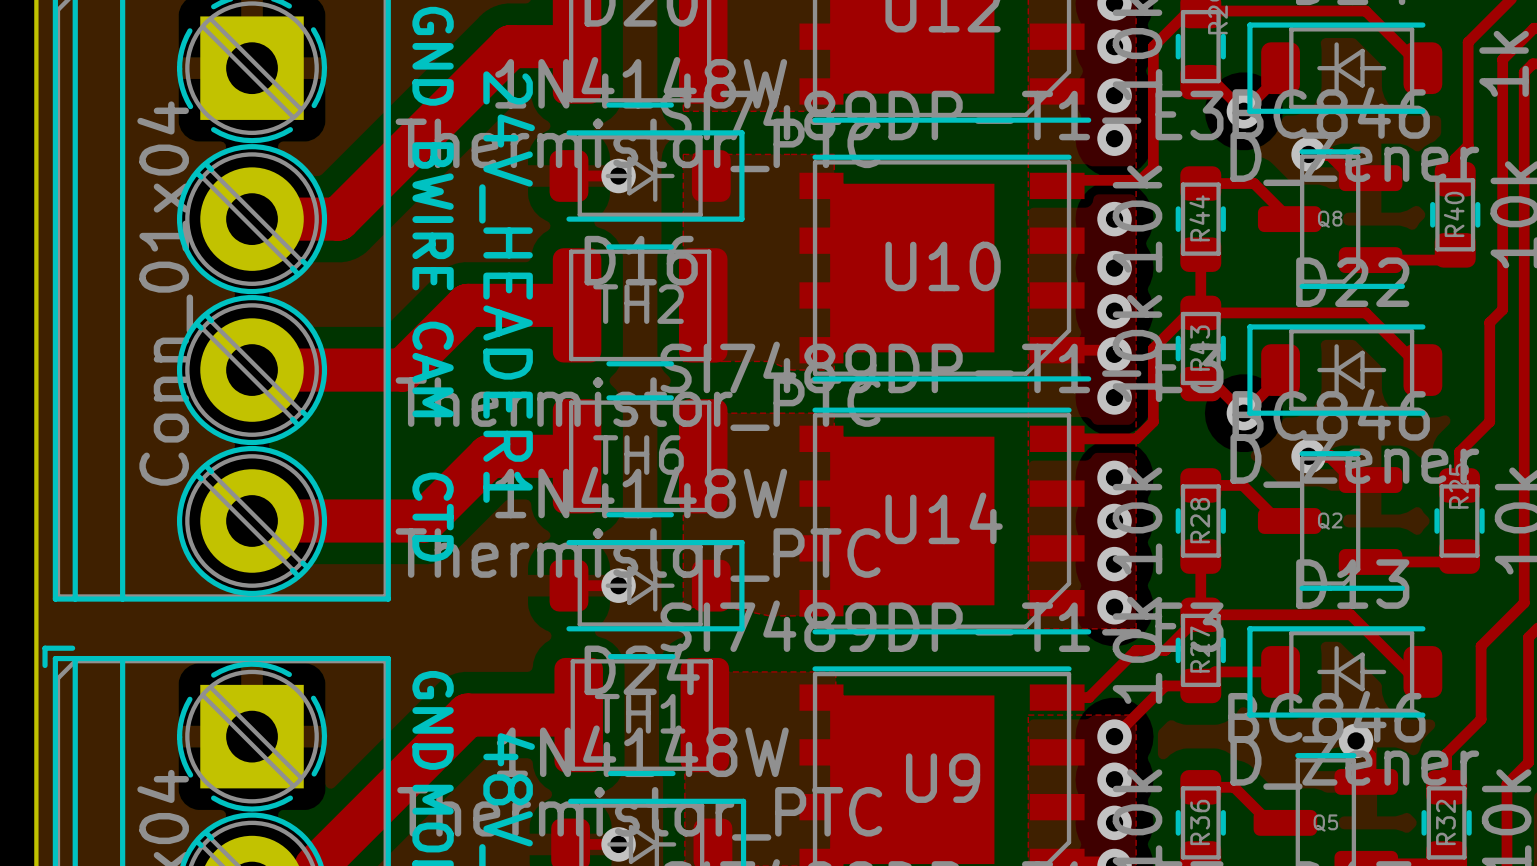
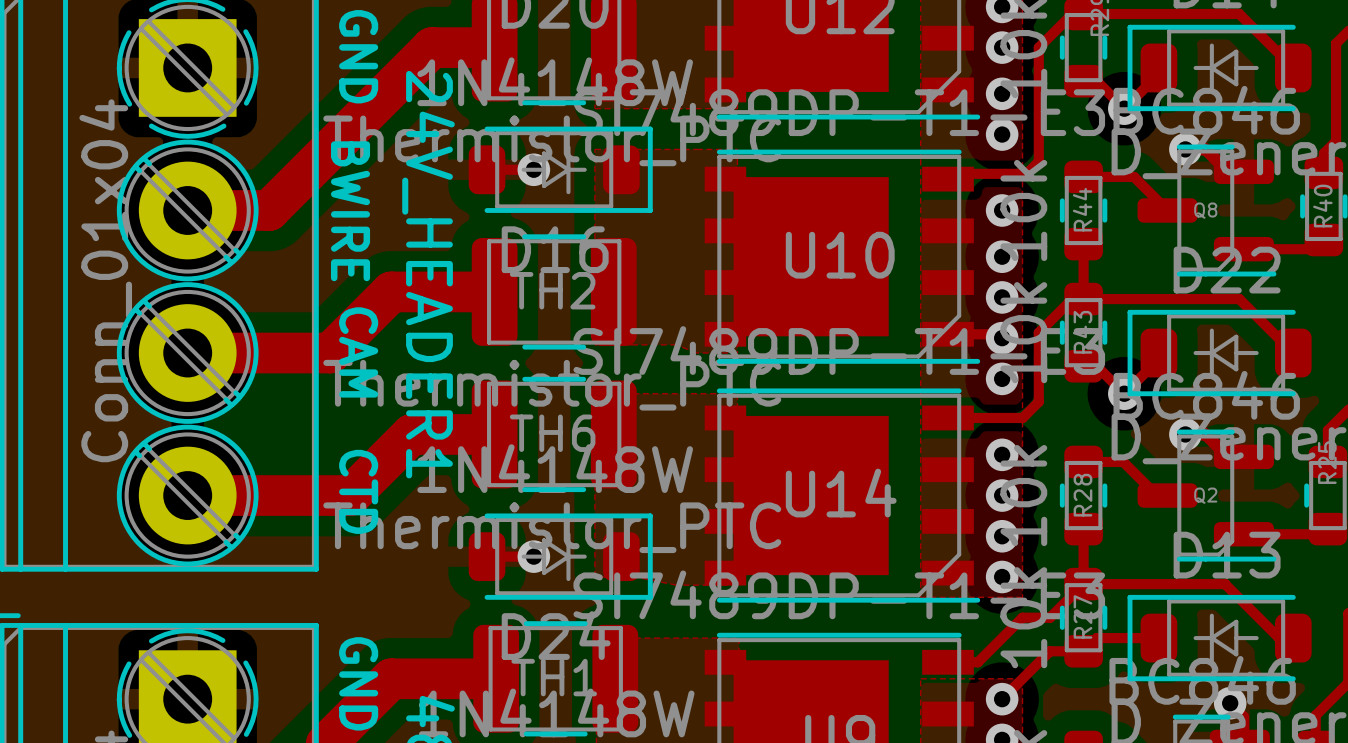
text position: BWIRE (433, 216) -> BWIRE (350, 211)

